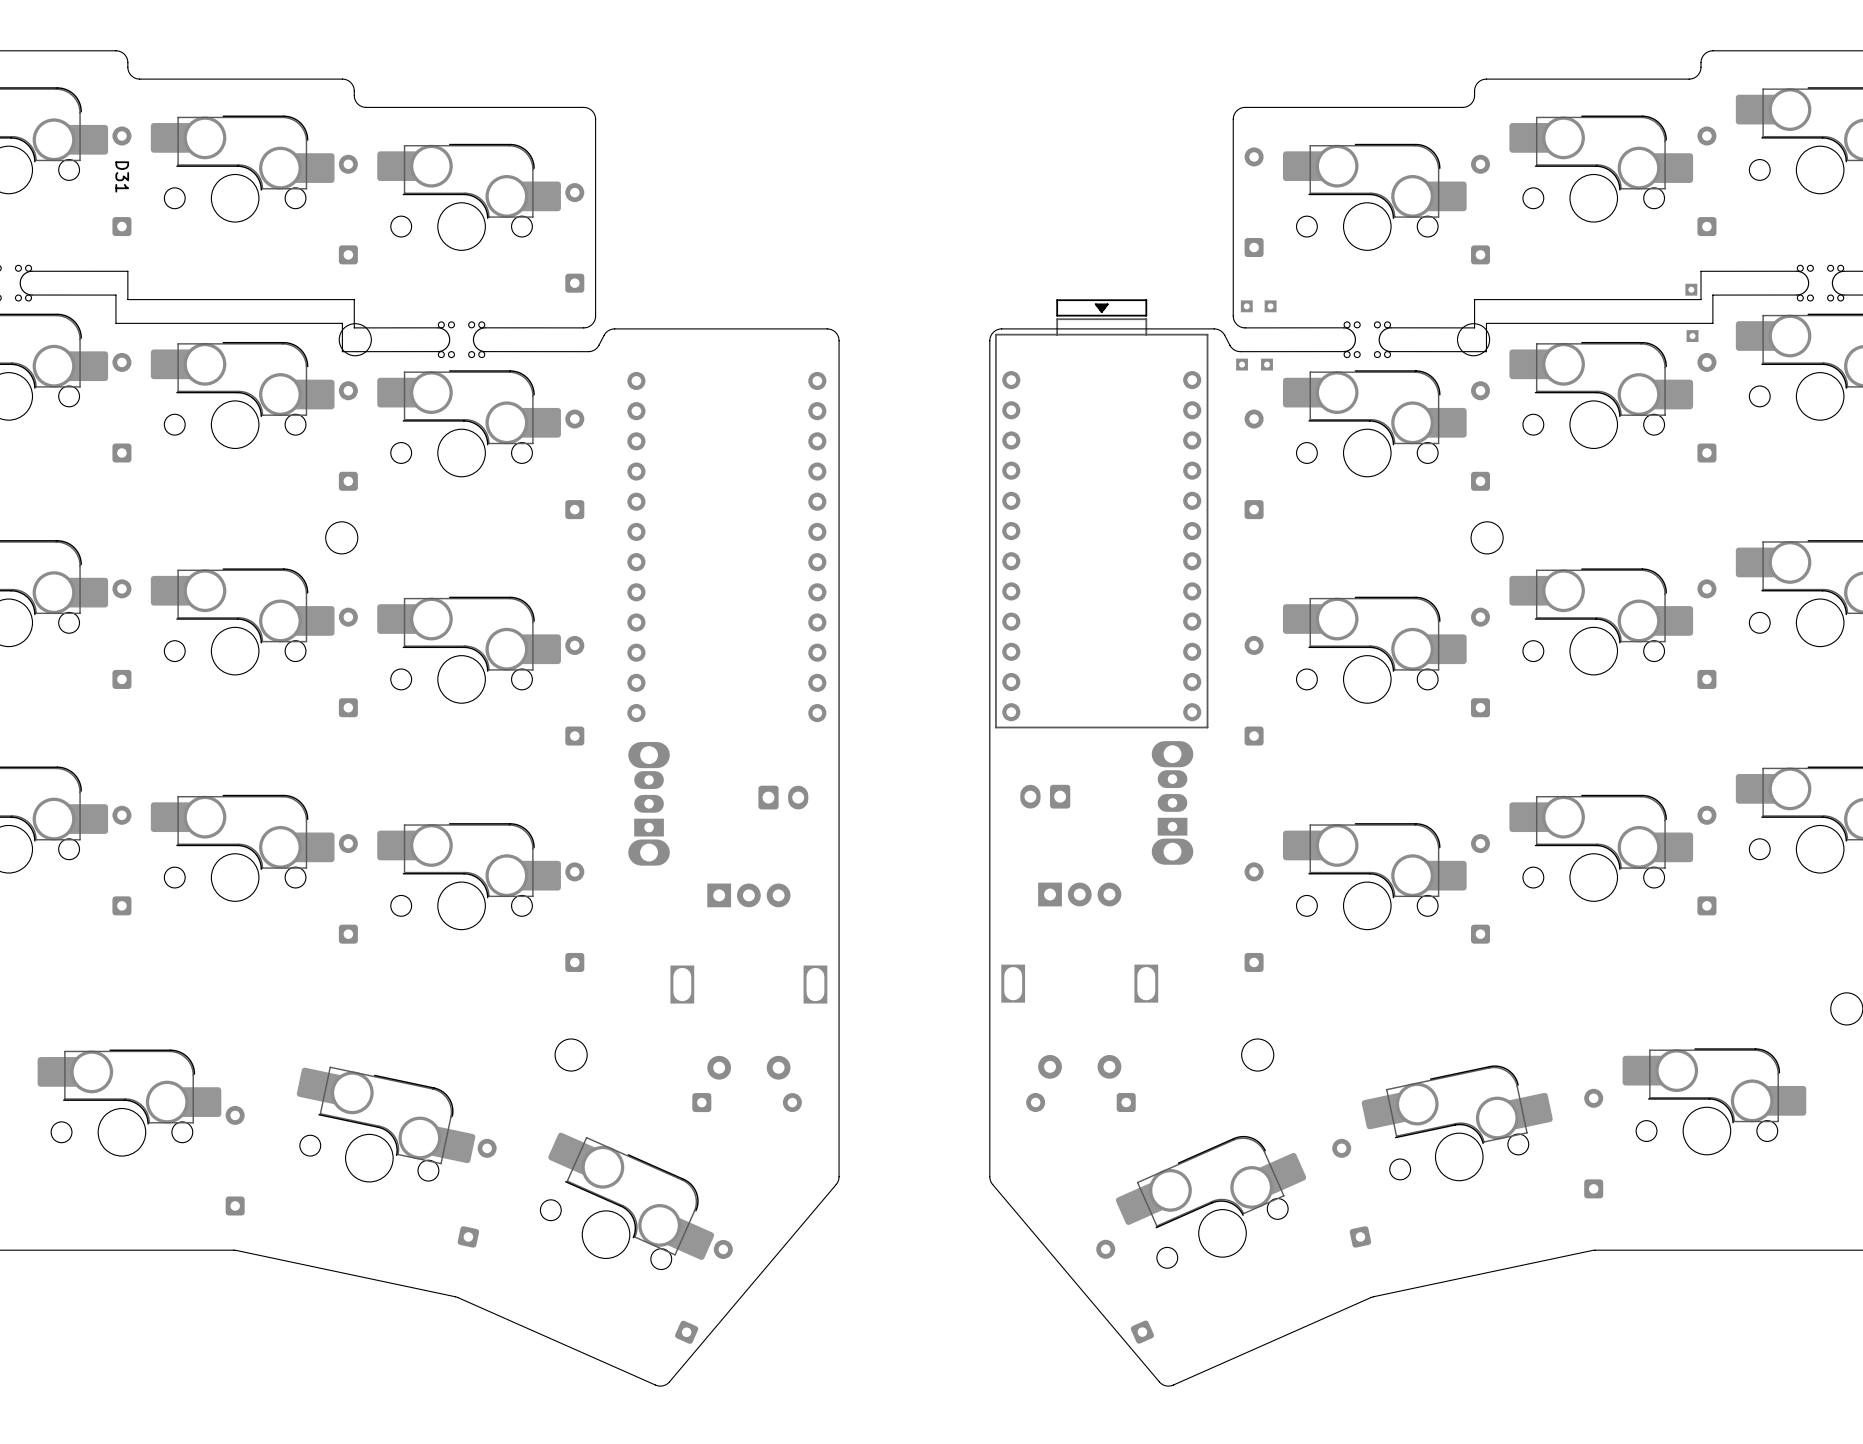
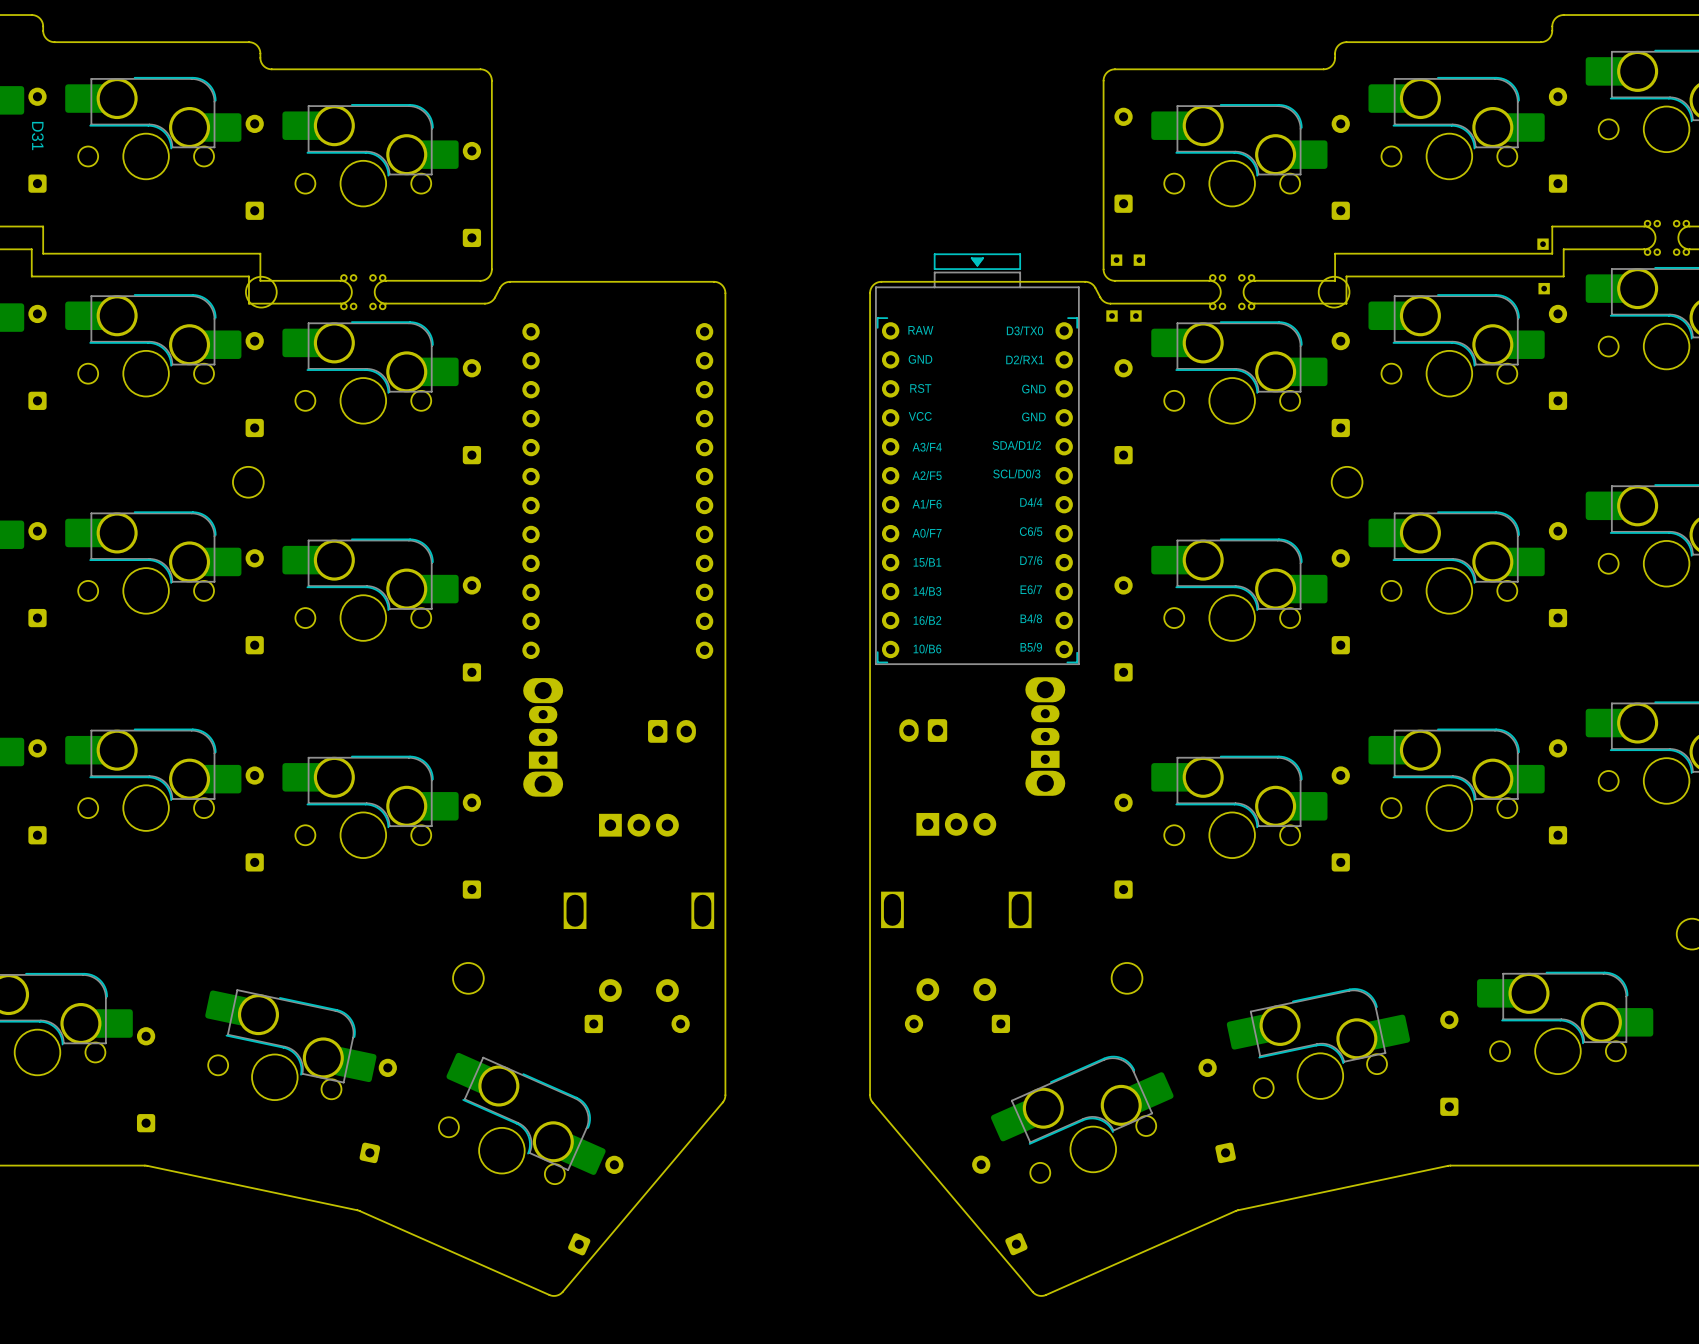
part footprint: [995, 299, 1209, 729] -> [875, 253, 1080, 666]

